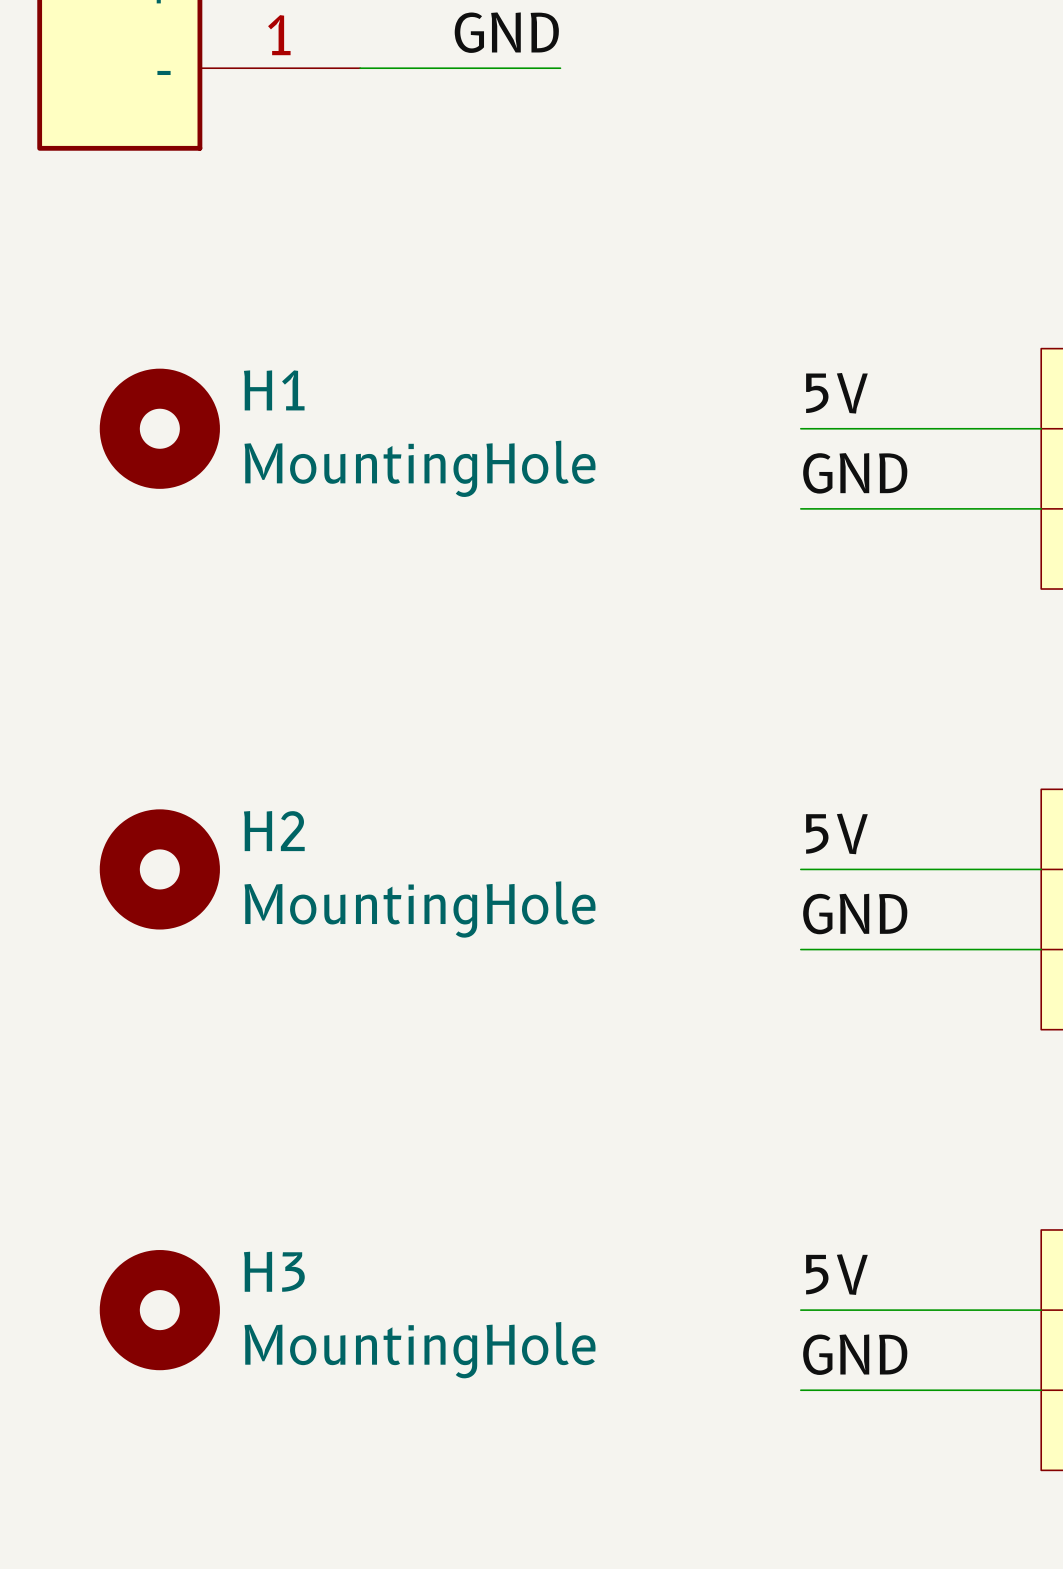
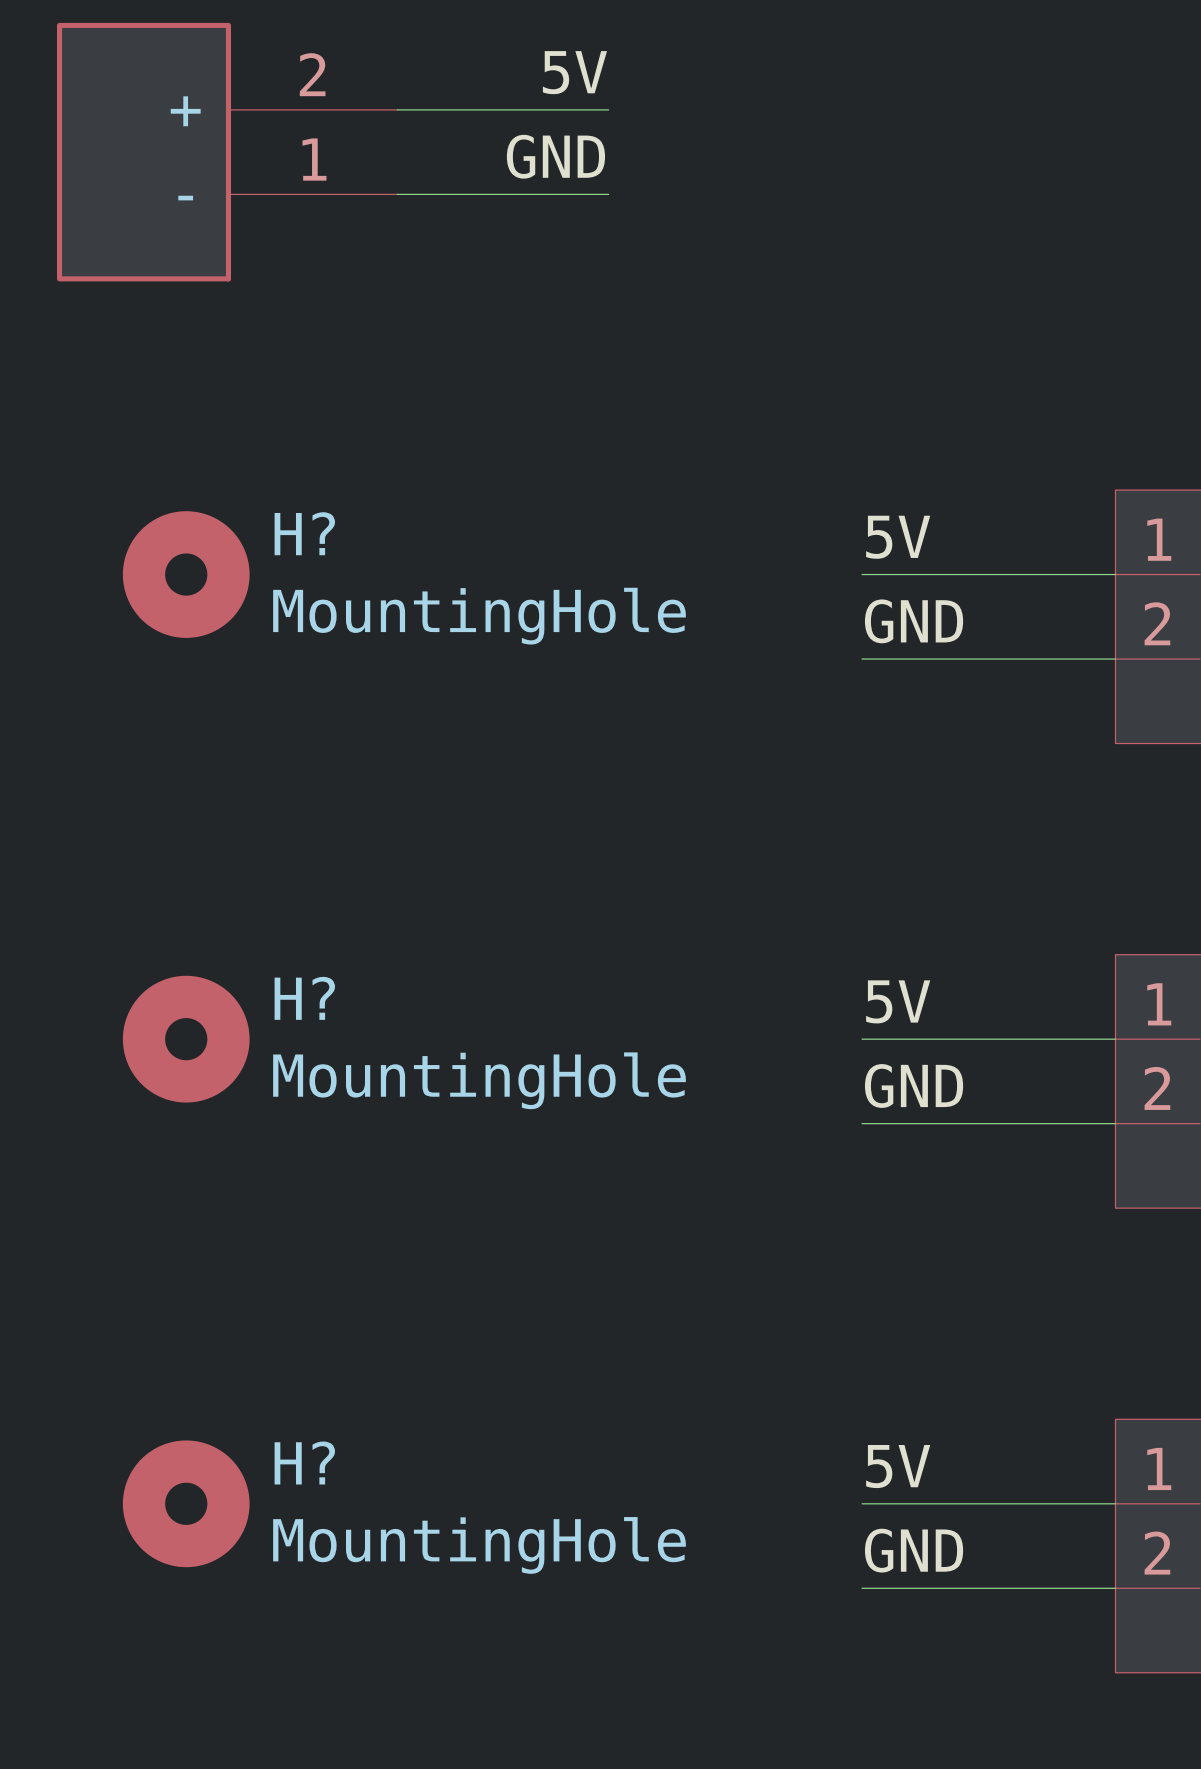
H1 name: H1 (274, 390) -> H? (304, 533)
H2 name: H2 (274, 831) -> H? (304, 998)
H3 name: H3 (274, 1271) -> H? (304, 1462)

